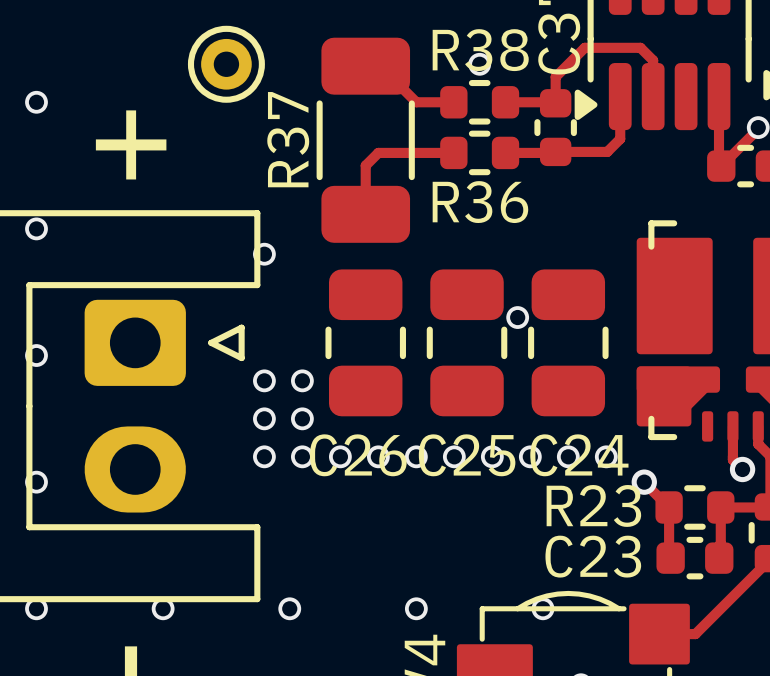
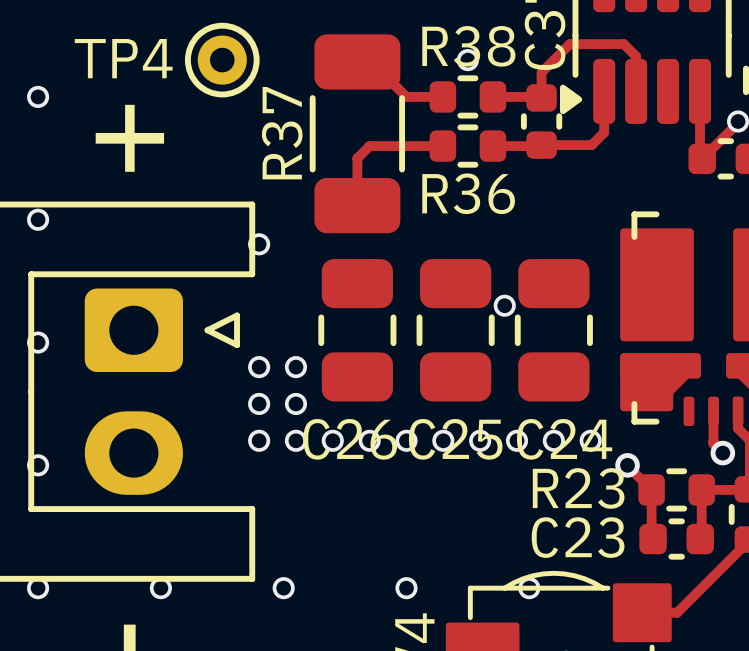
TP4 name: none -> TP4 (123, 58)

